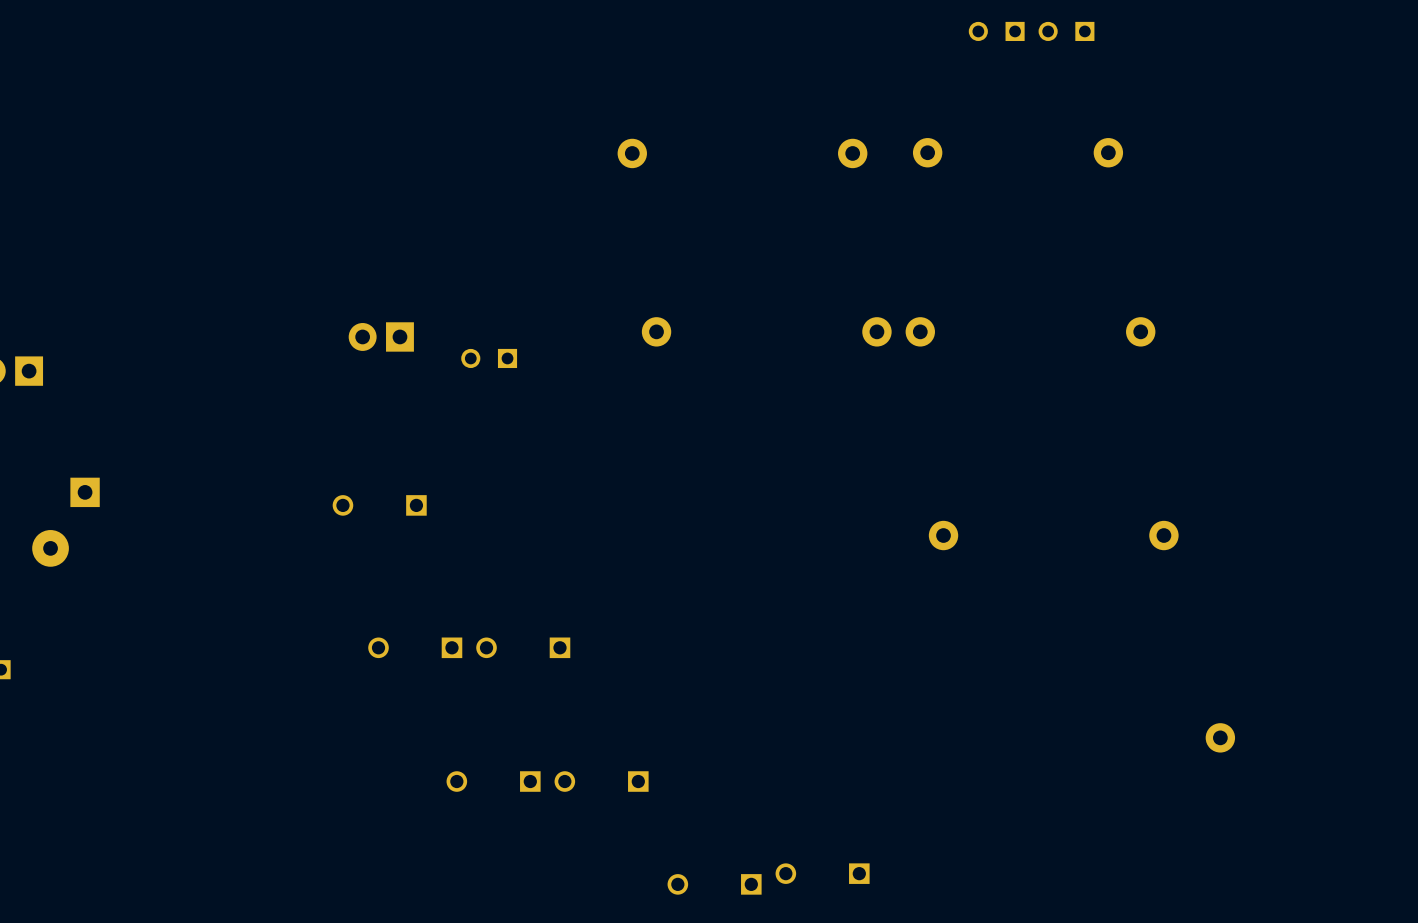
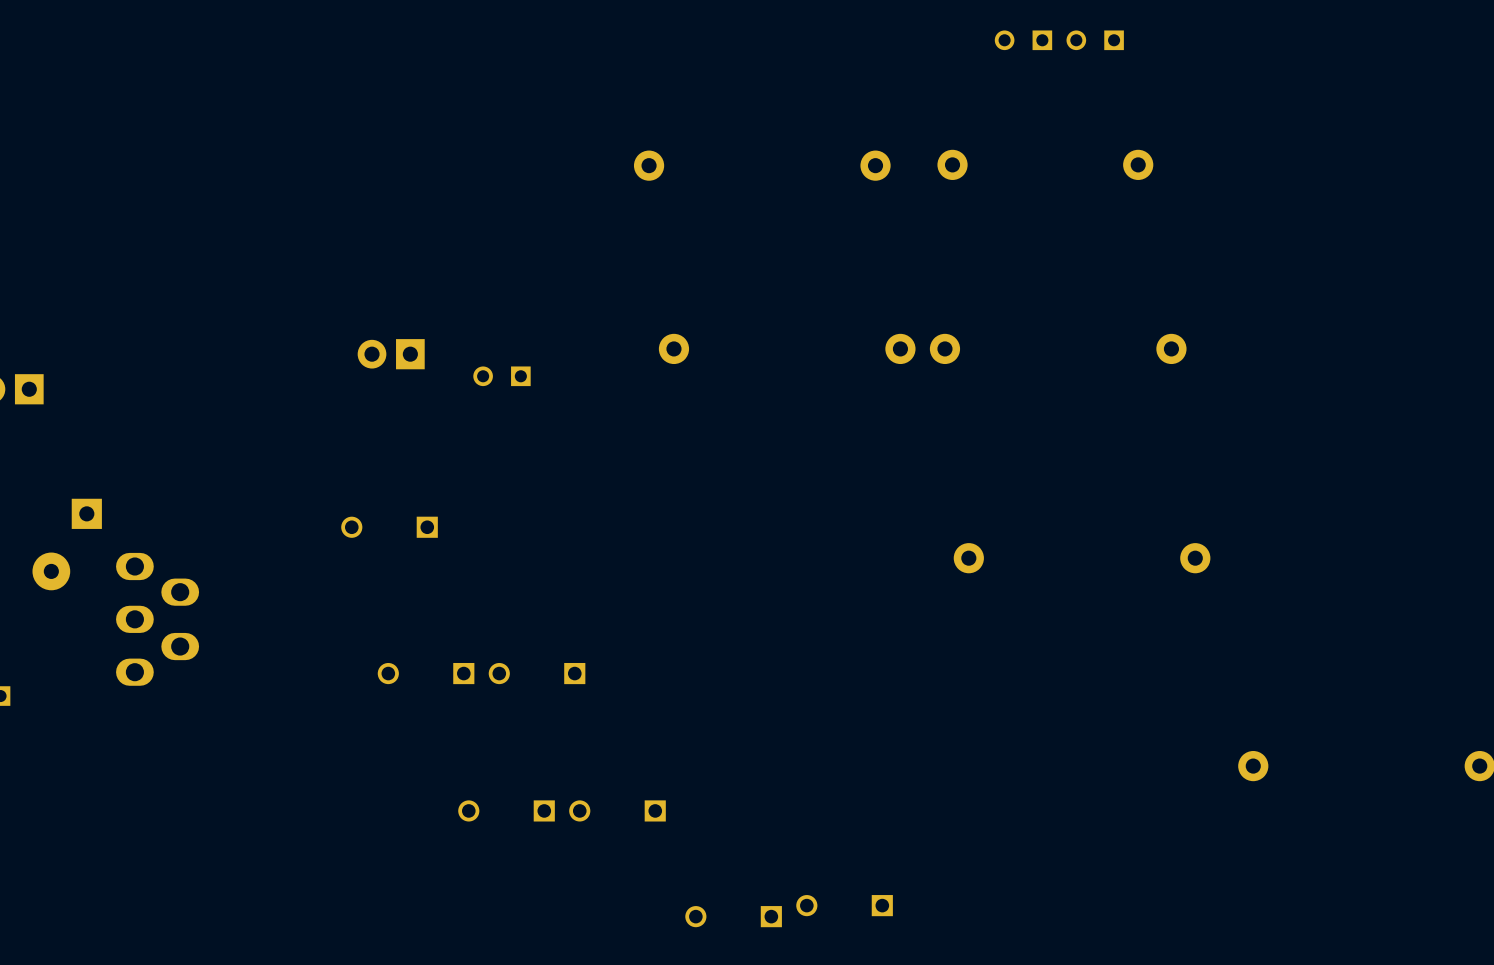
part: none -> (157, 619)

